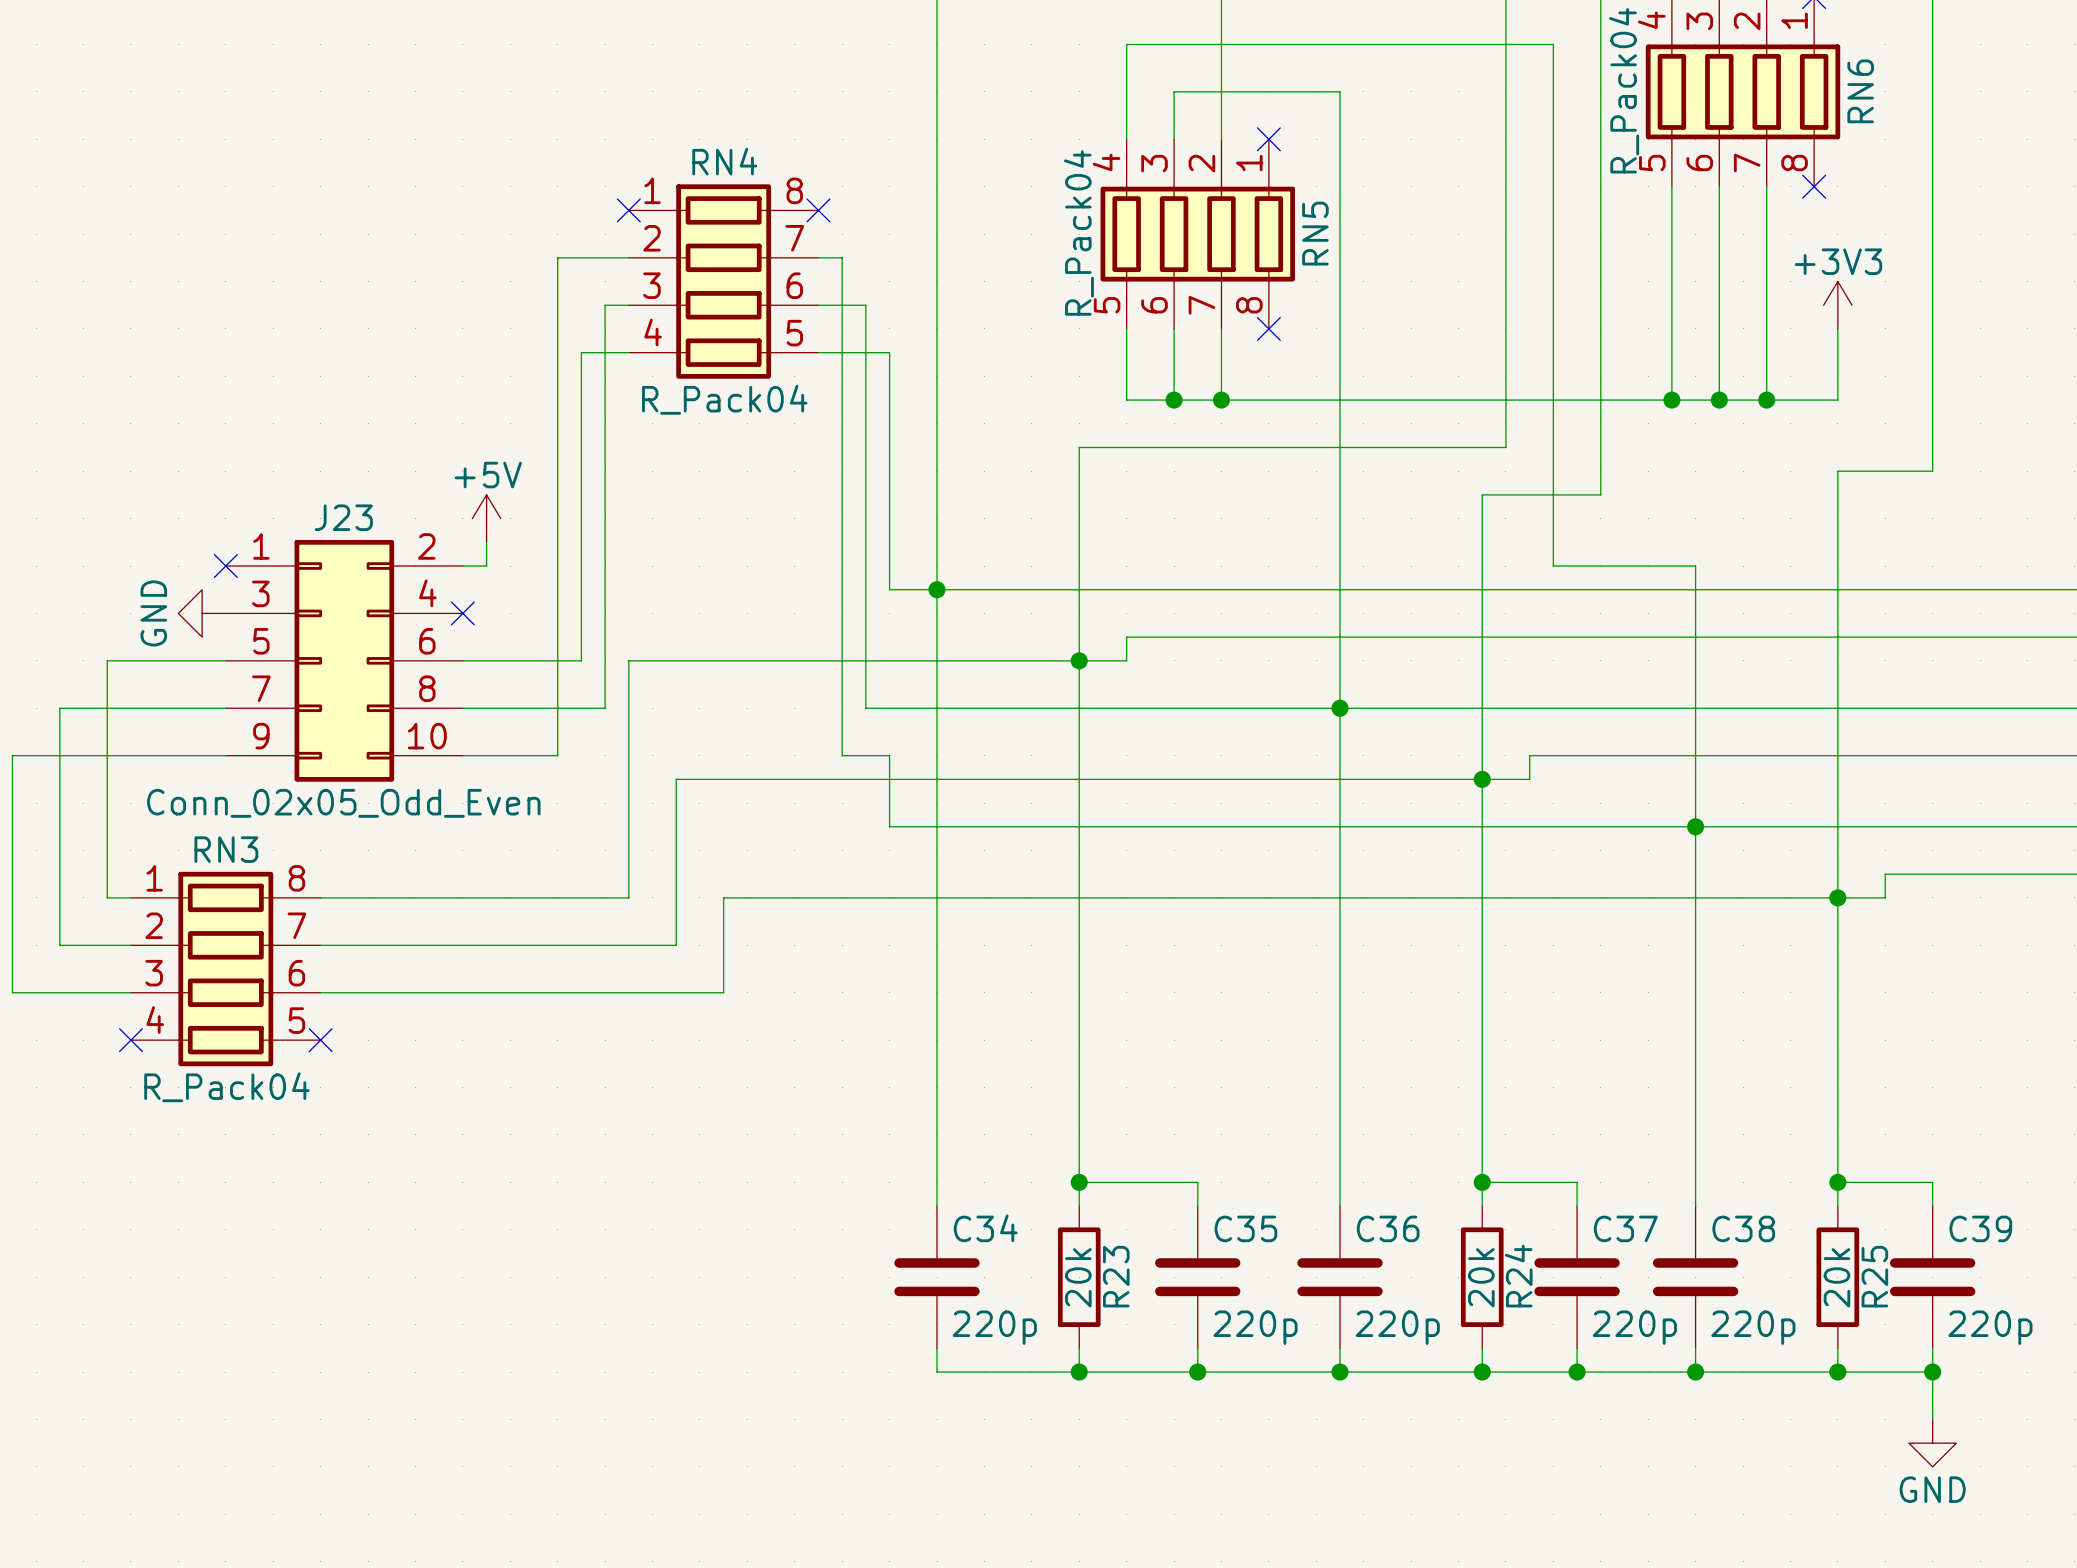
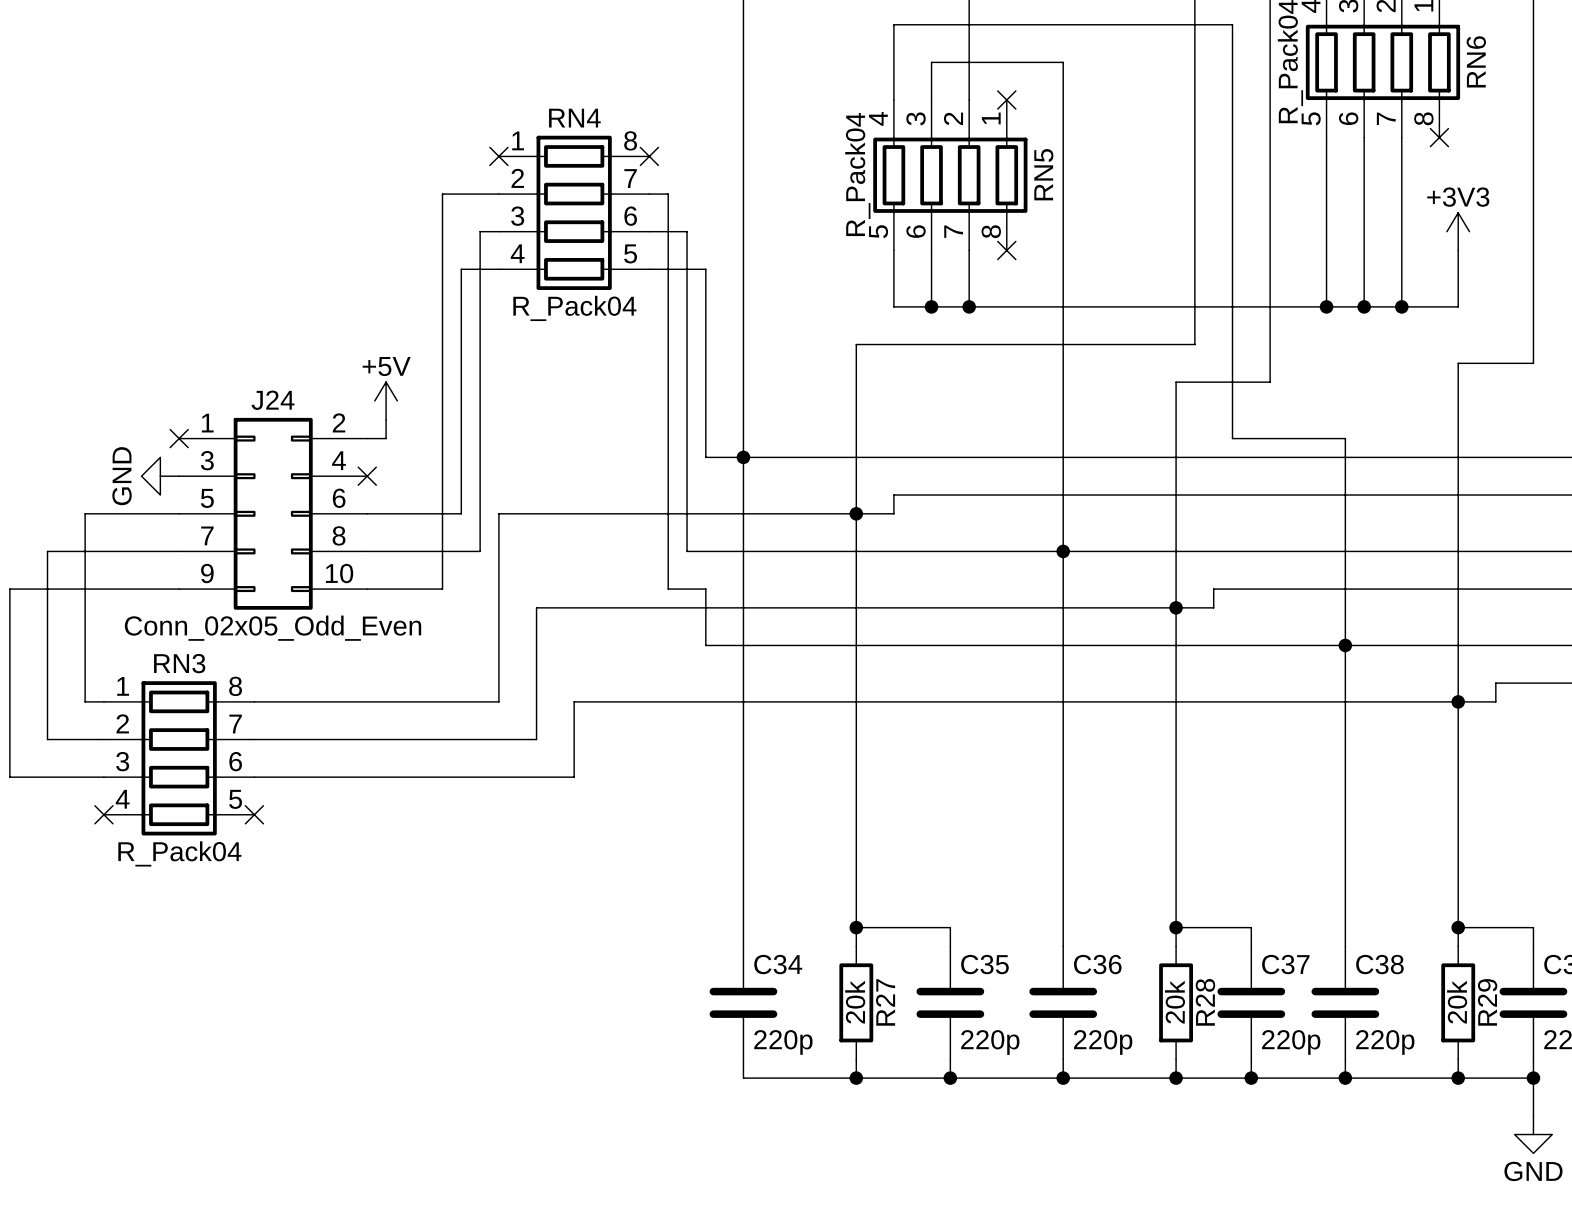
J23 name: J23 (343, 517) -> J24 (273, 400)
R23 name: R23 (1116, 1276) -> R27 (885, 1002)
R24 name: R24 (1518, 1276) -> R28 (1205, 1002)
R25 name: R25 (1874, 1276) -> R29 (1487, 1002)

